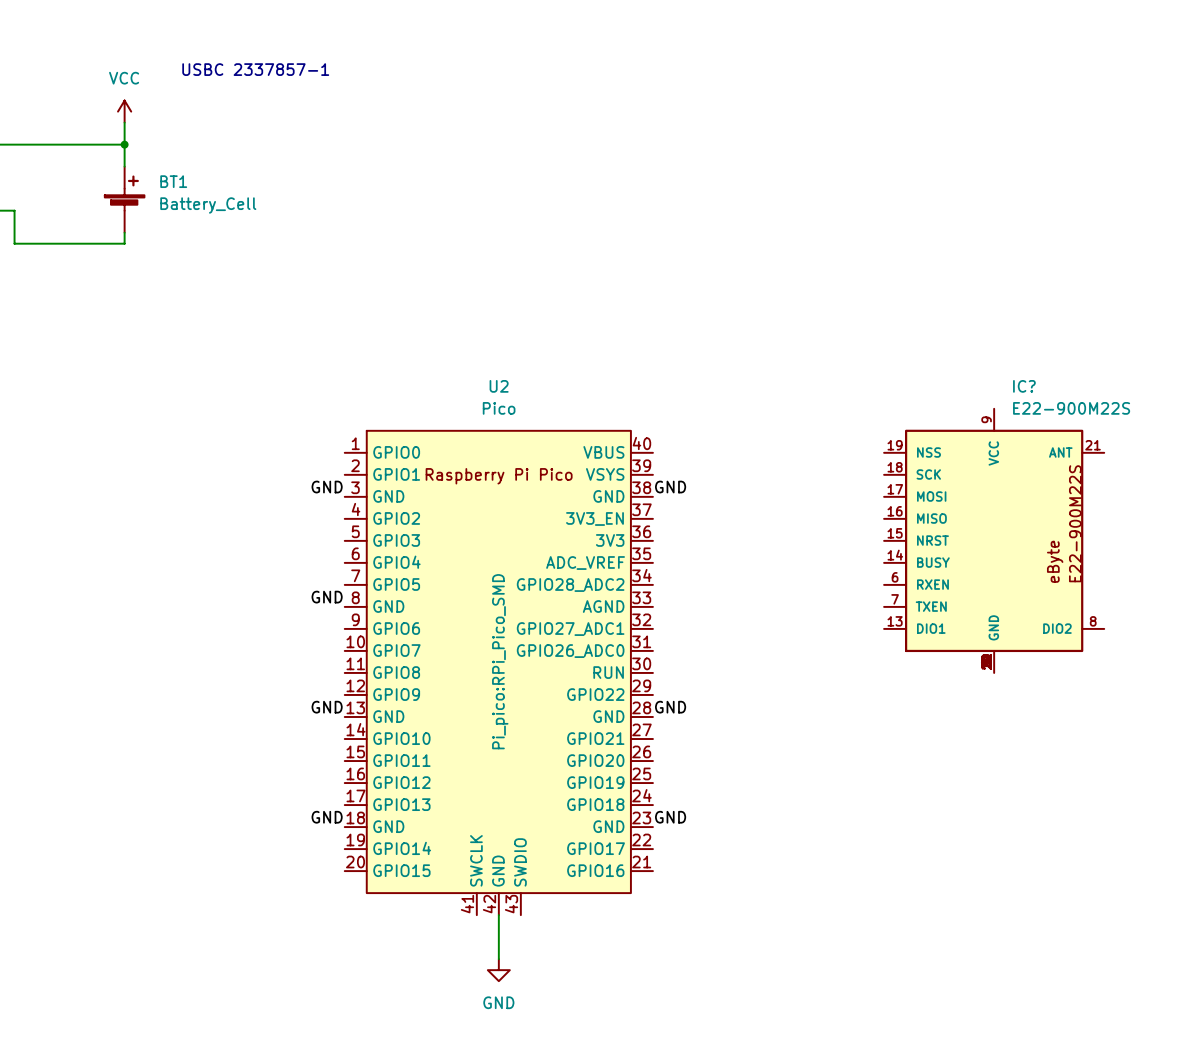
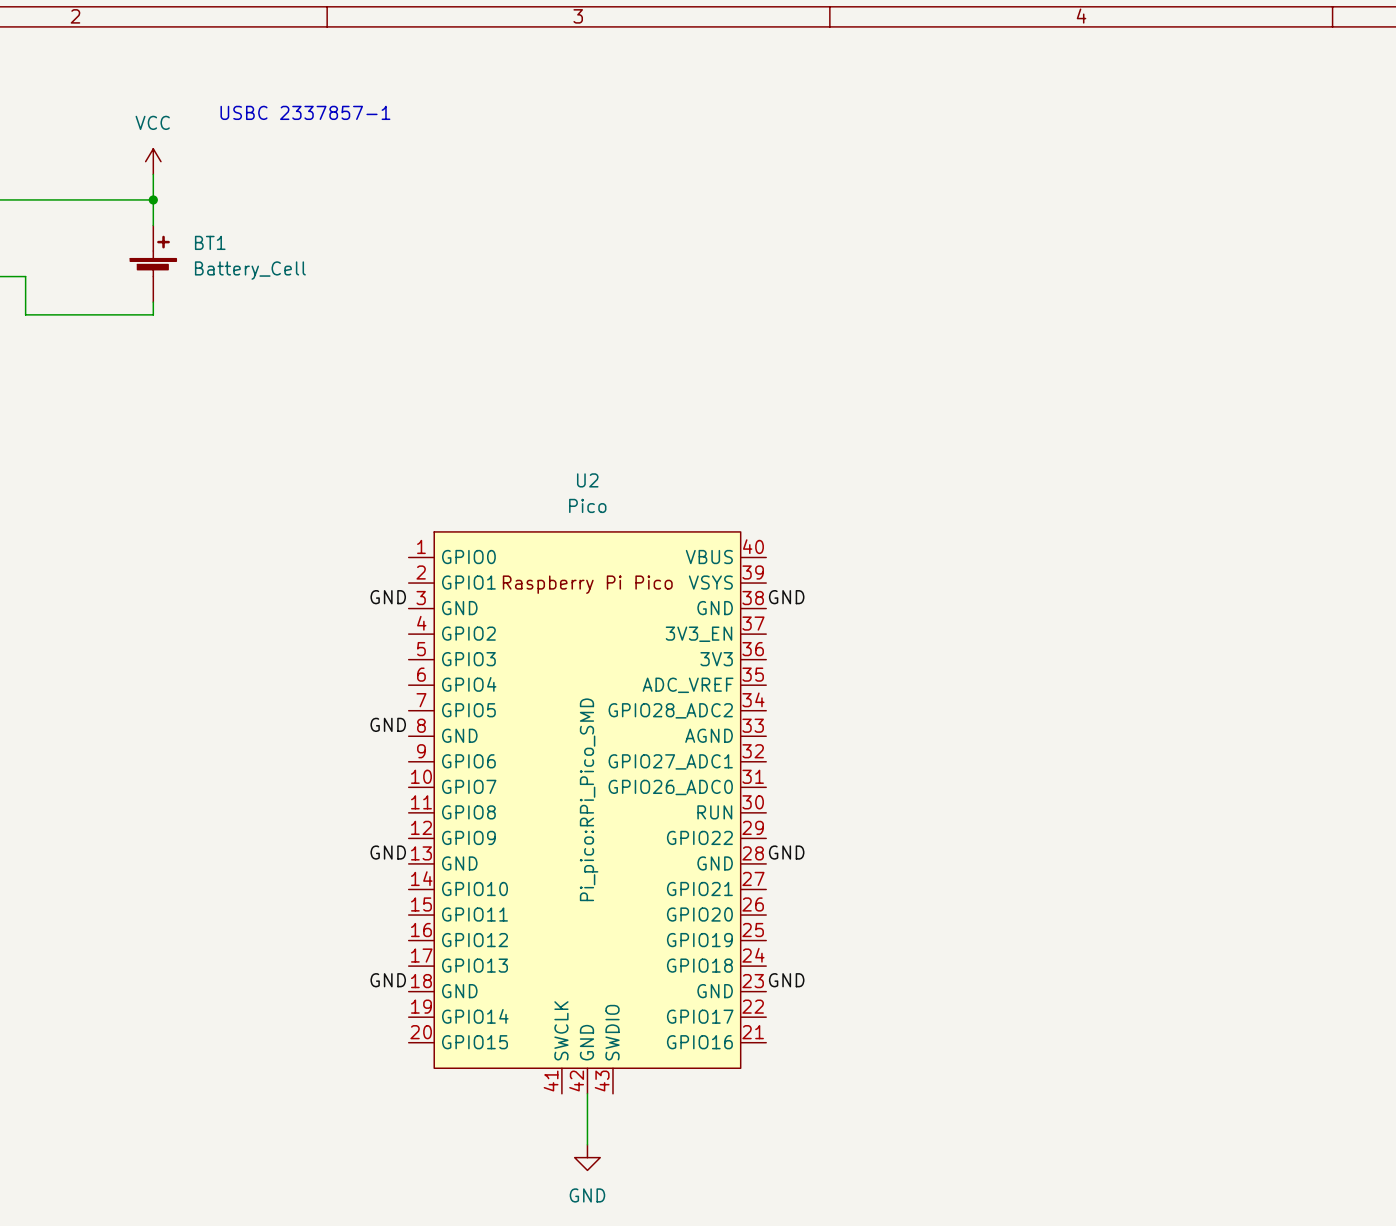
IC?: E22-900M22S (994, 540) -> none

